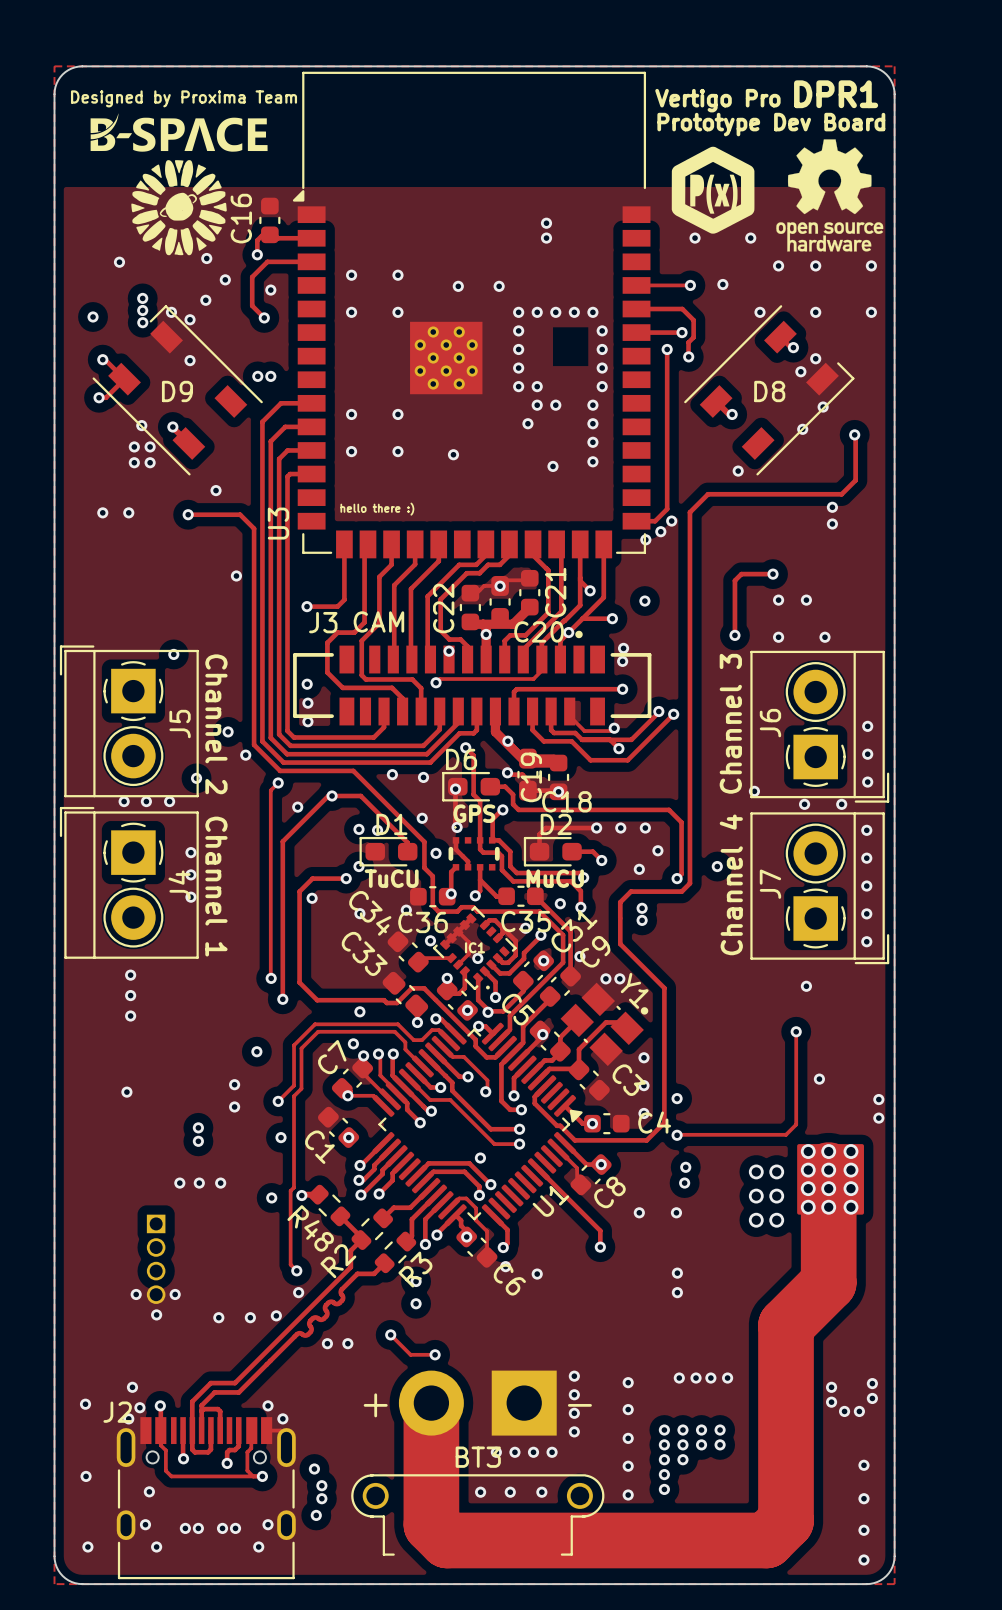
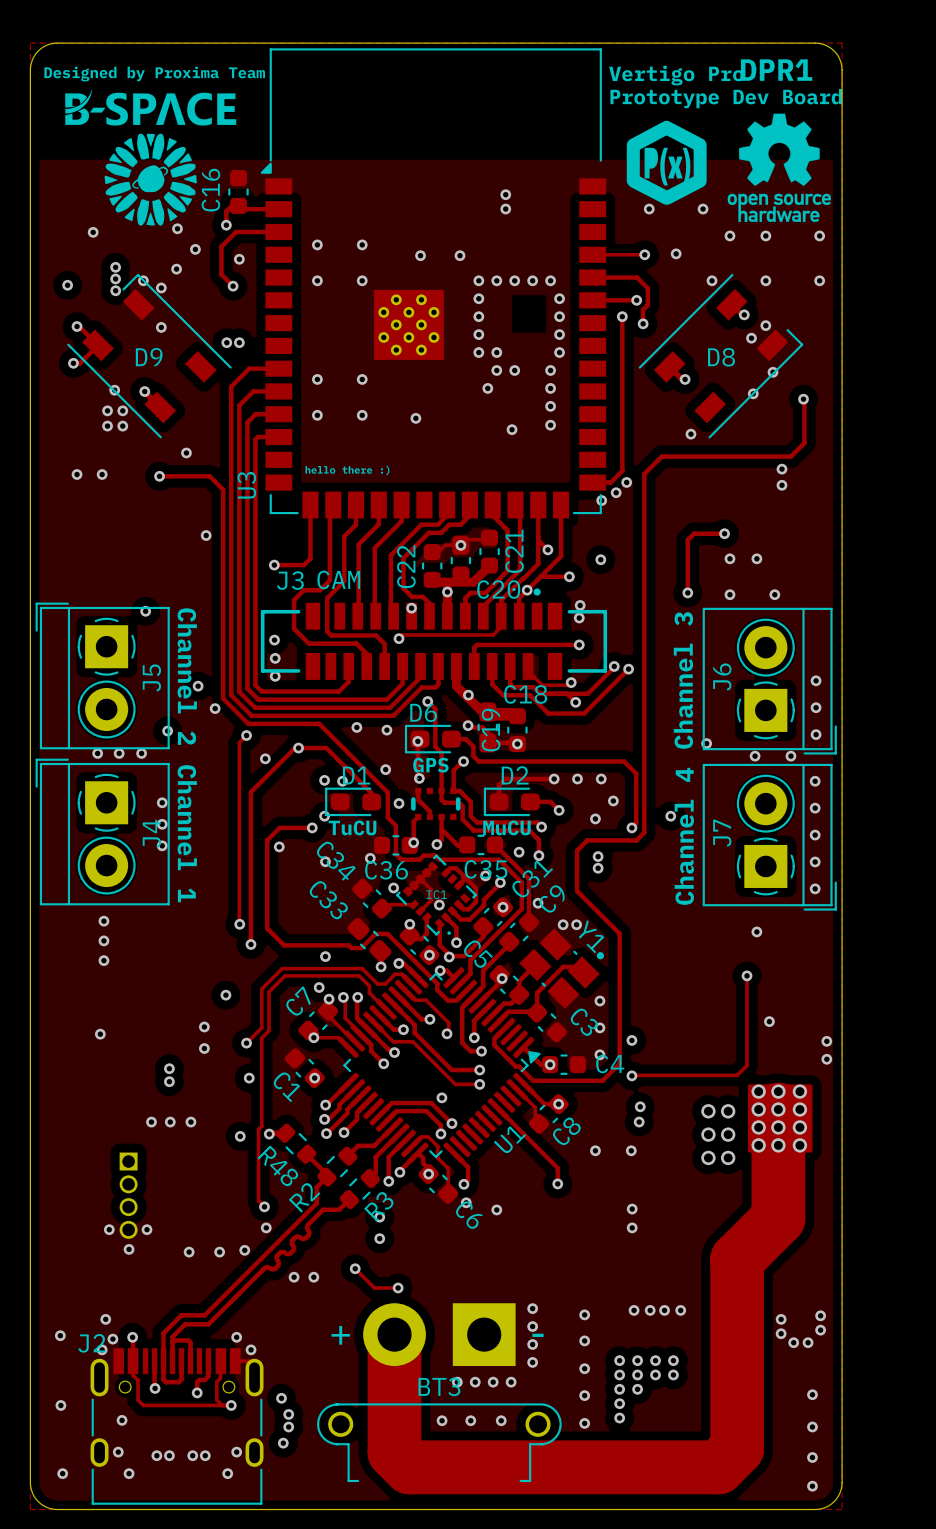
C18 name position: C18 (566, 801) -> C18 (525, 694)

